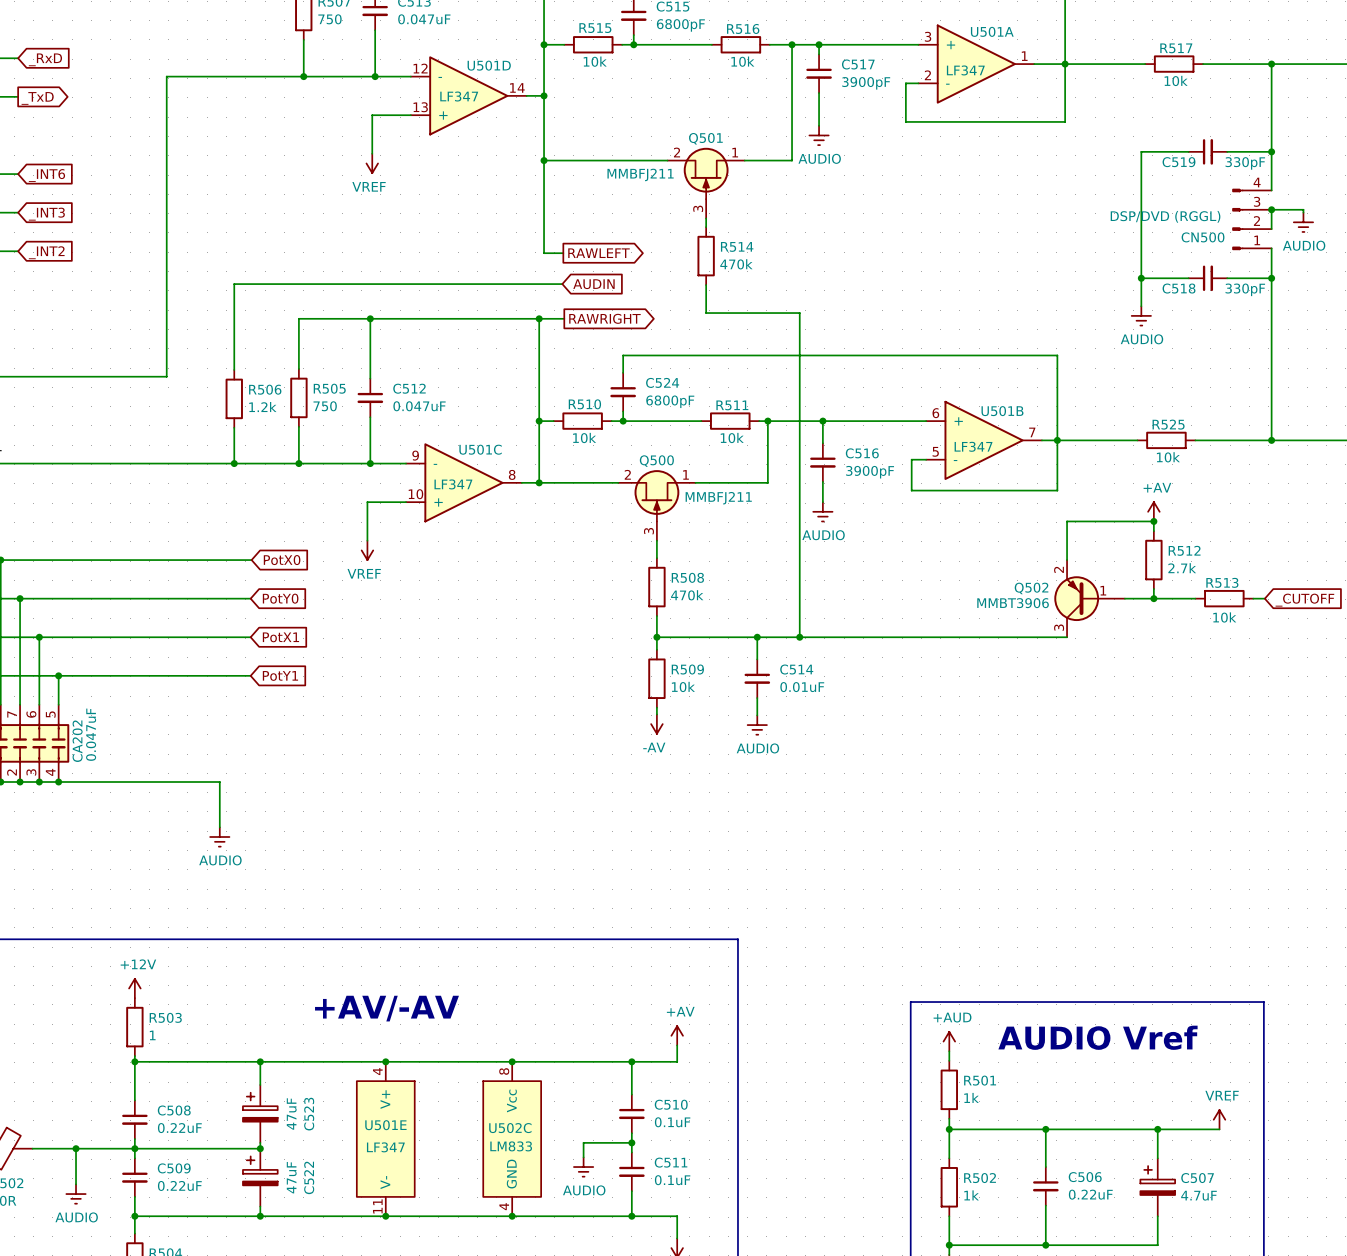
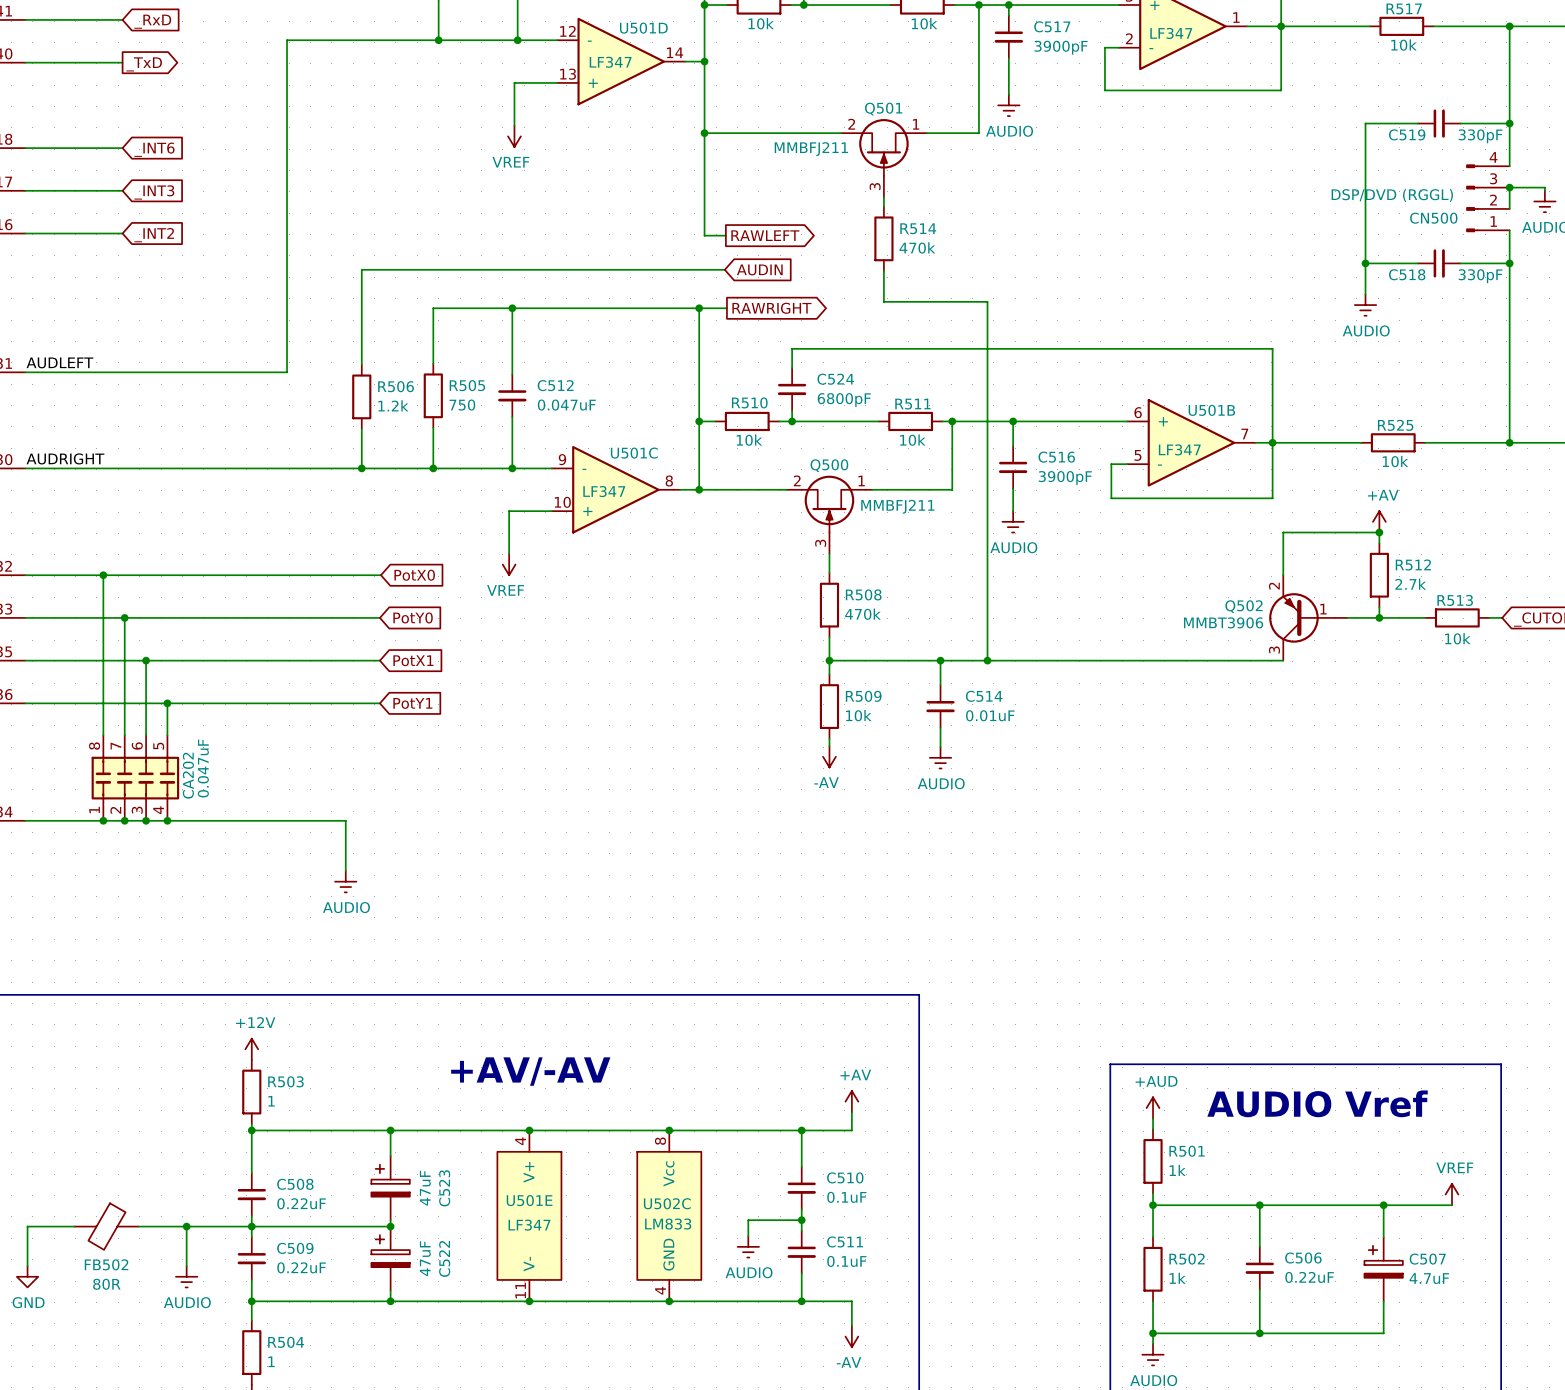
Q501 symbol: [667, 147, 745, 219] -> [841, 119, 927, 198]
Q500 symbol: [618, 470, 696, 541] -> [786, 475, 873, 554]
Q502 symbol: [1054, 560, 1125, 638] -> [1269, 575, 1348, 661]

